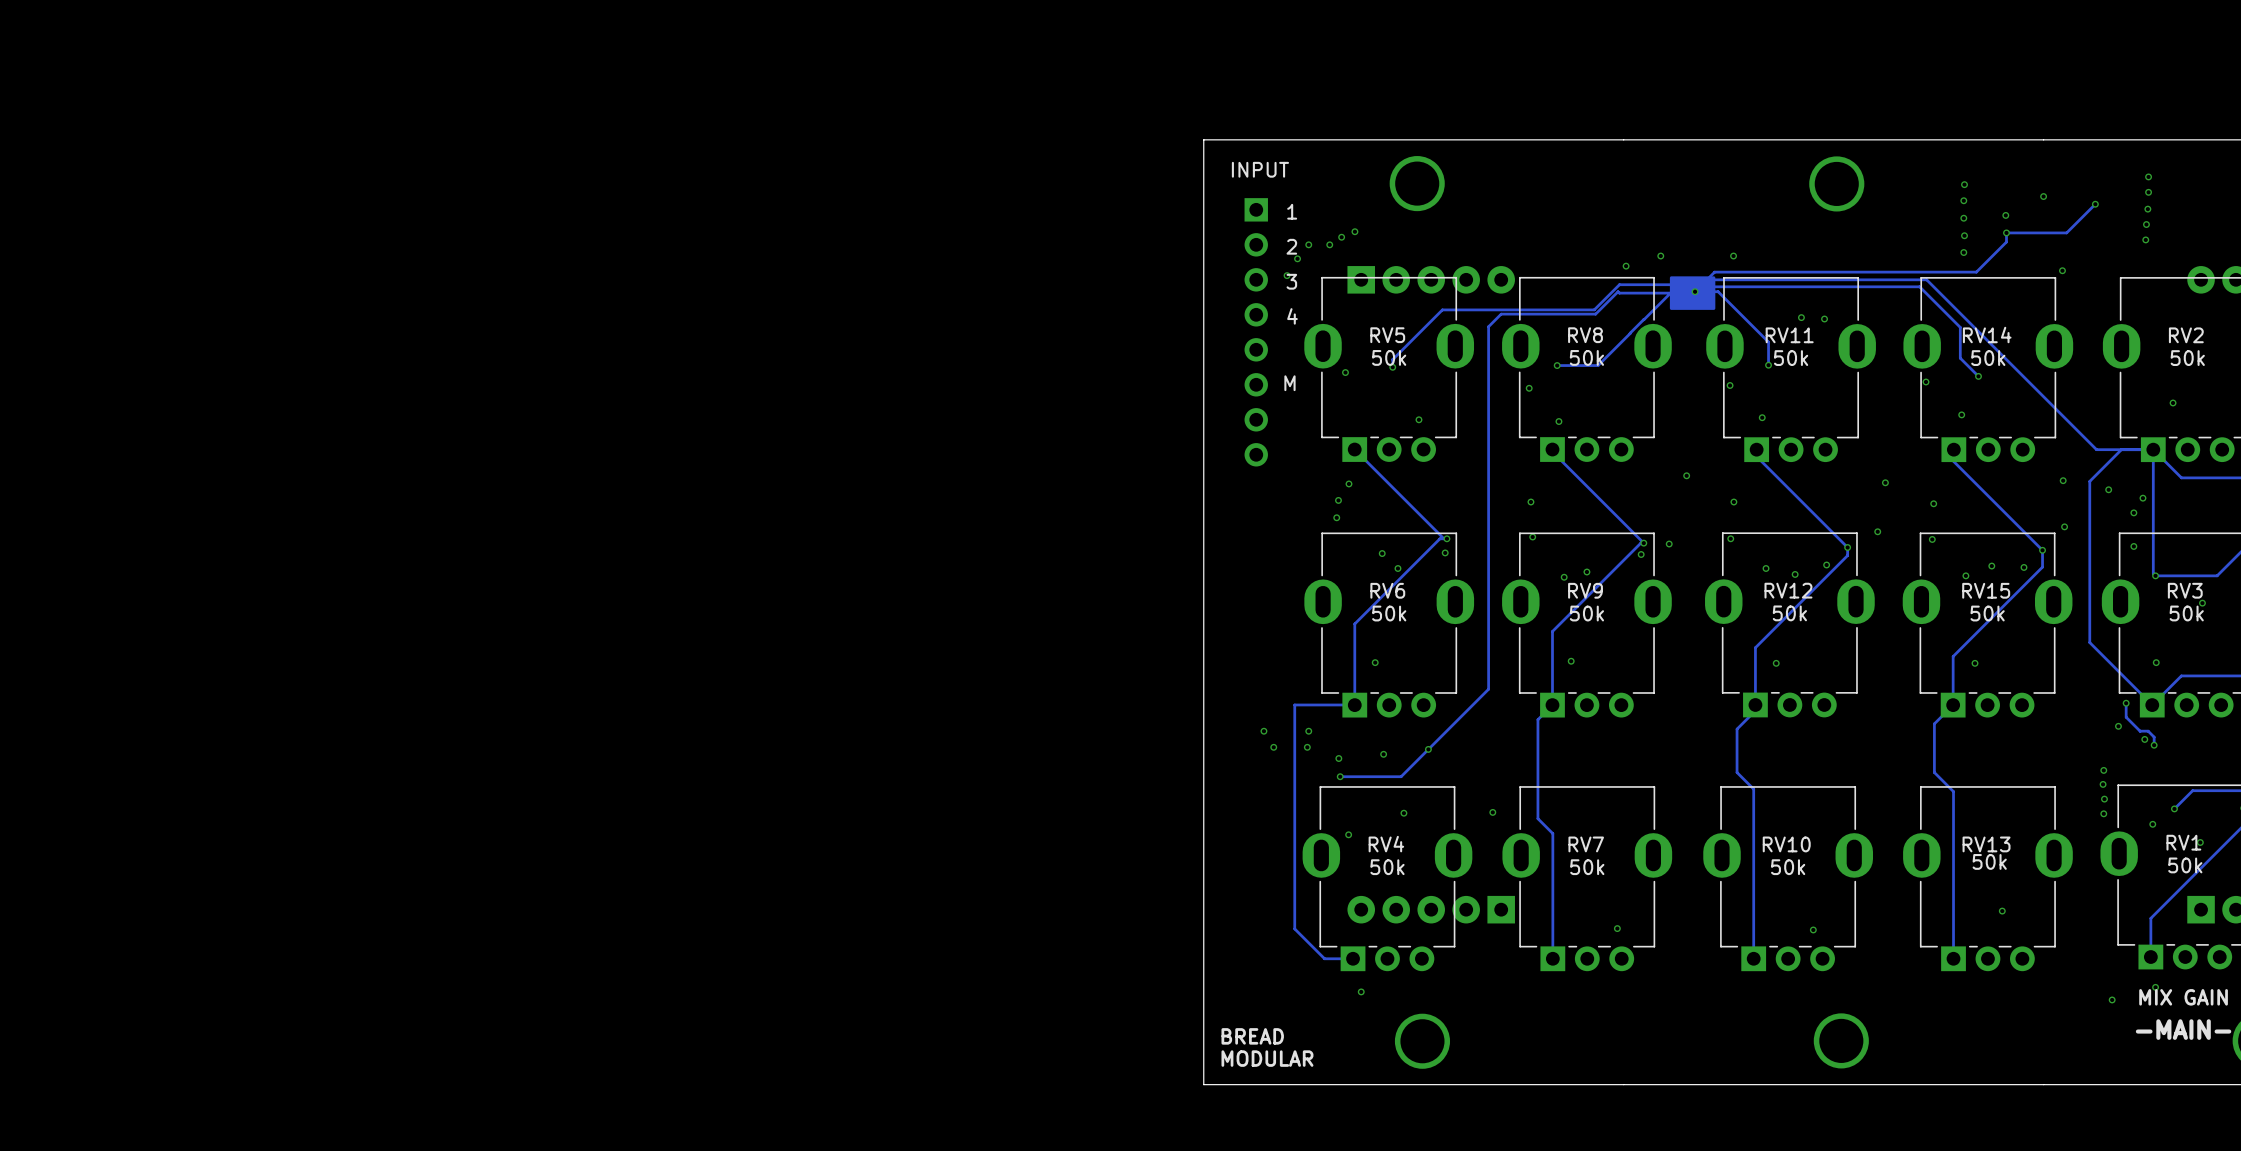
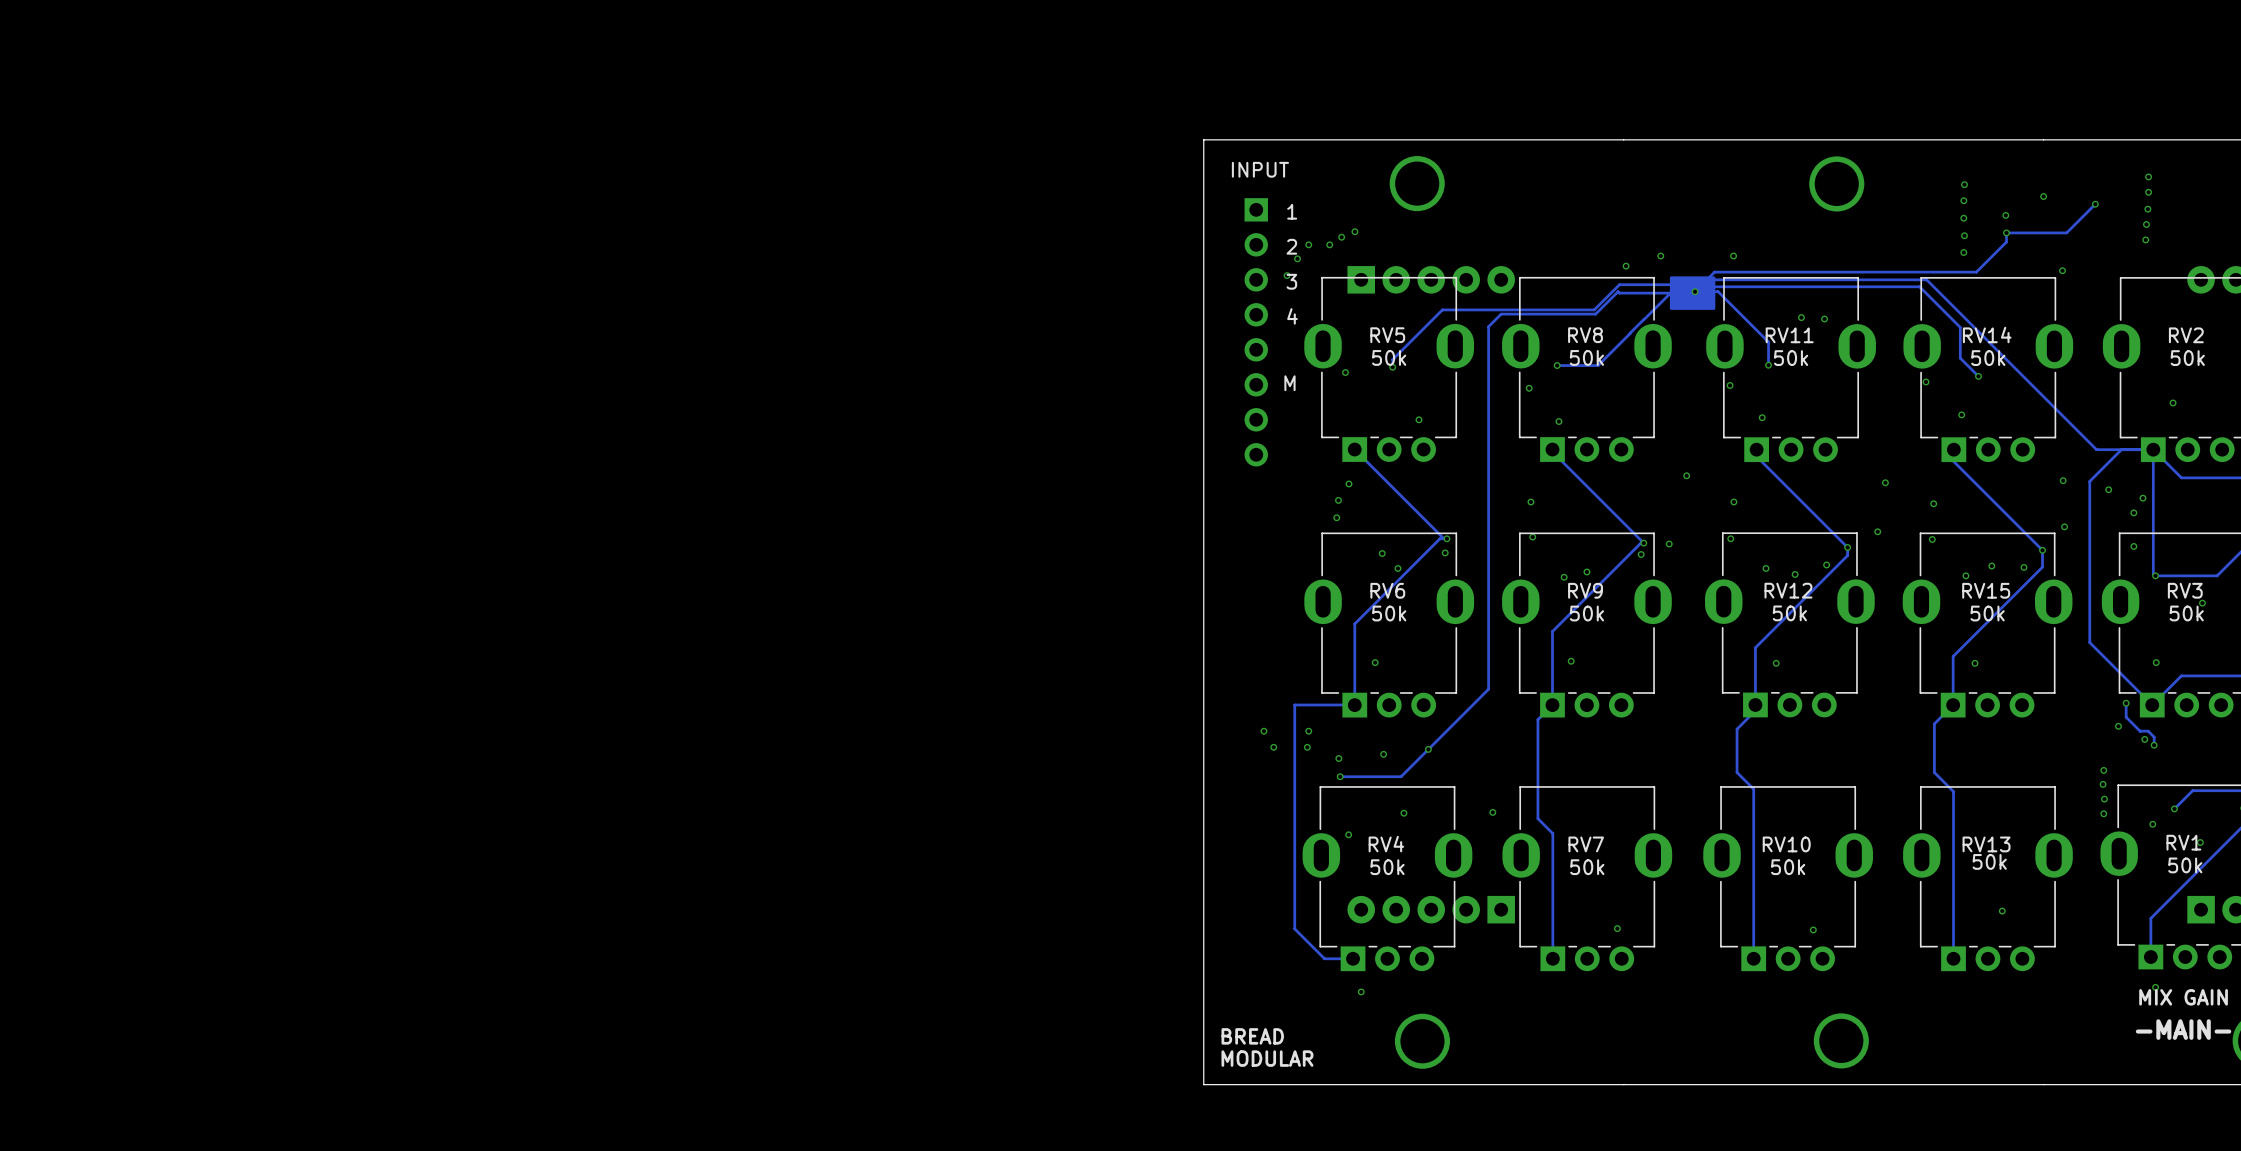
via: (2112, 999) -> none

